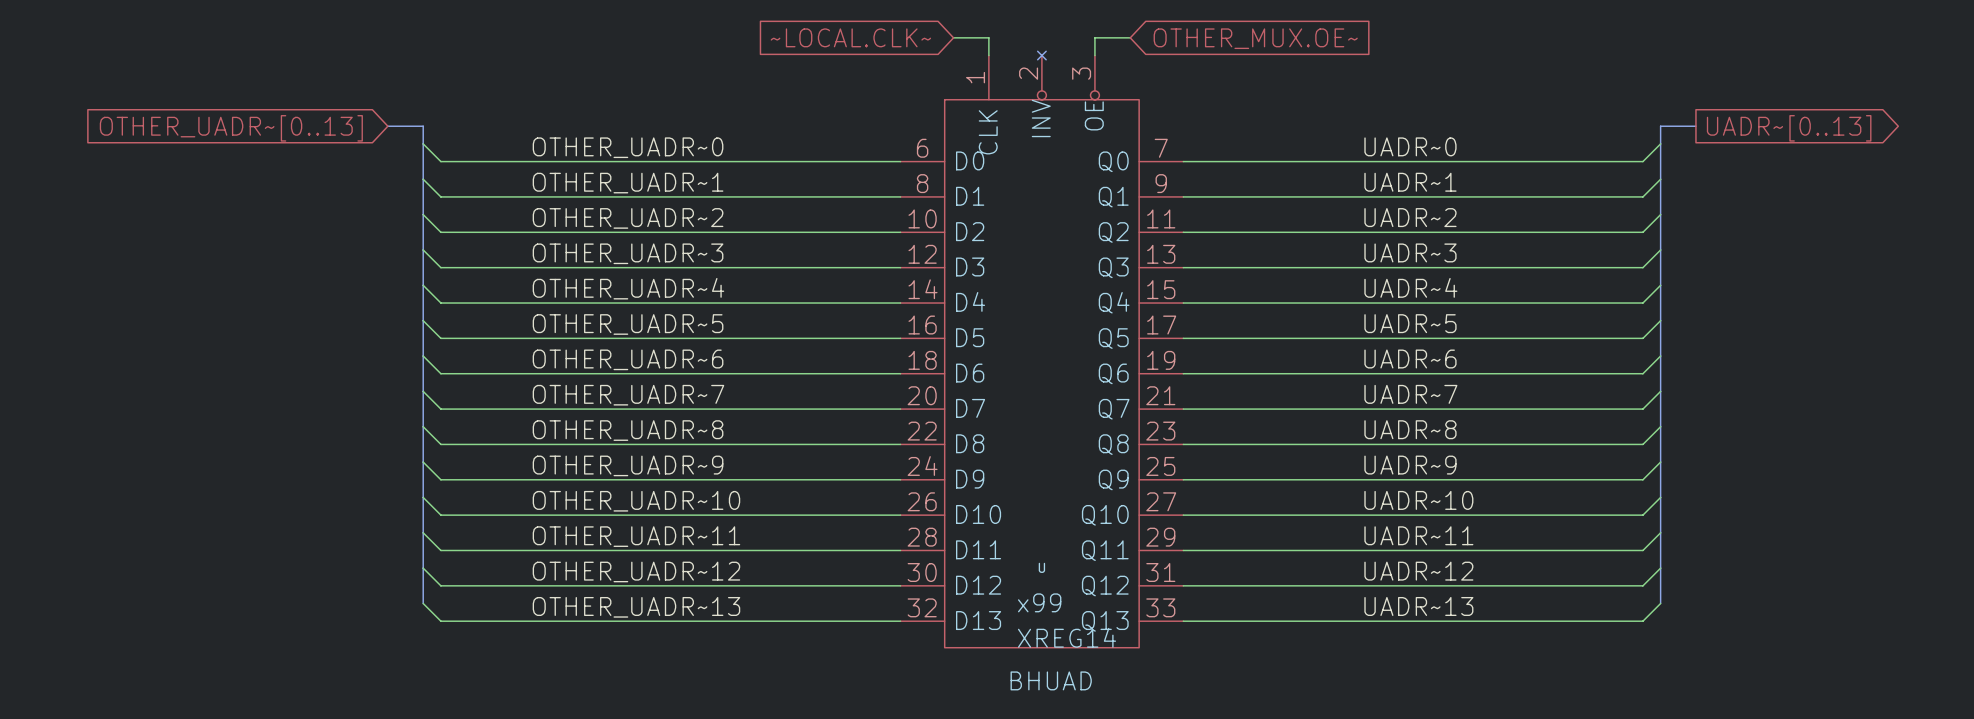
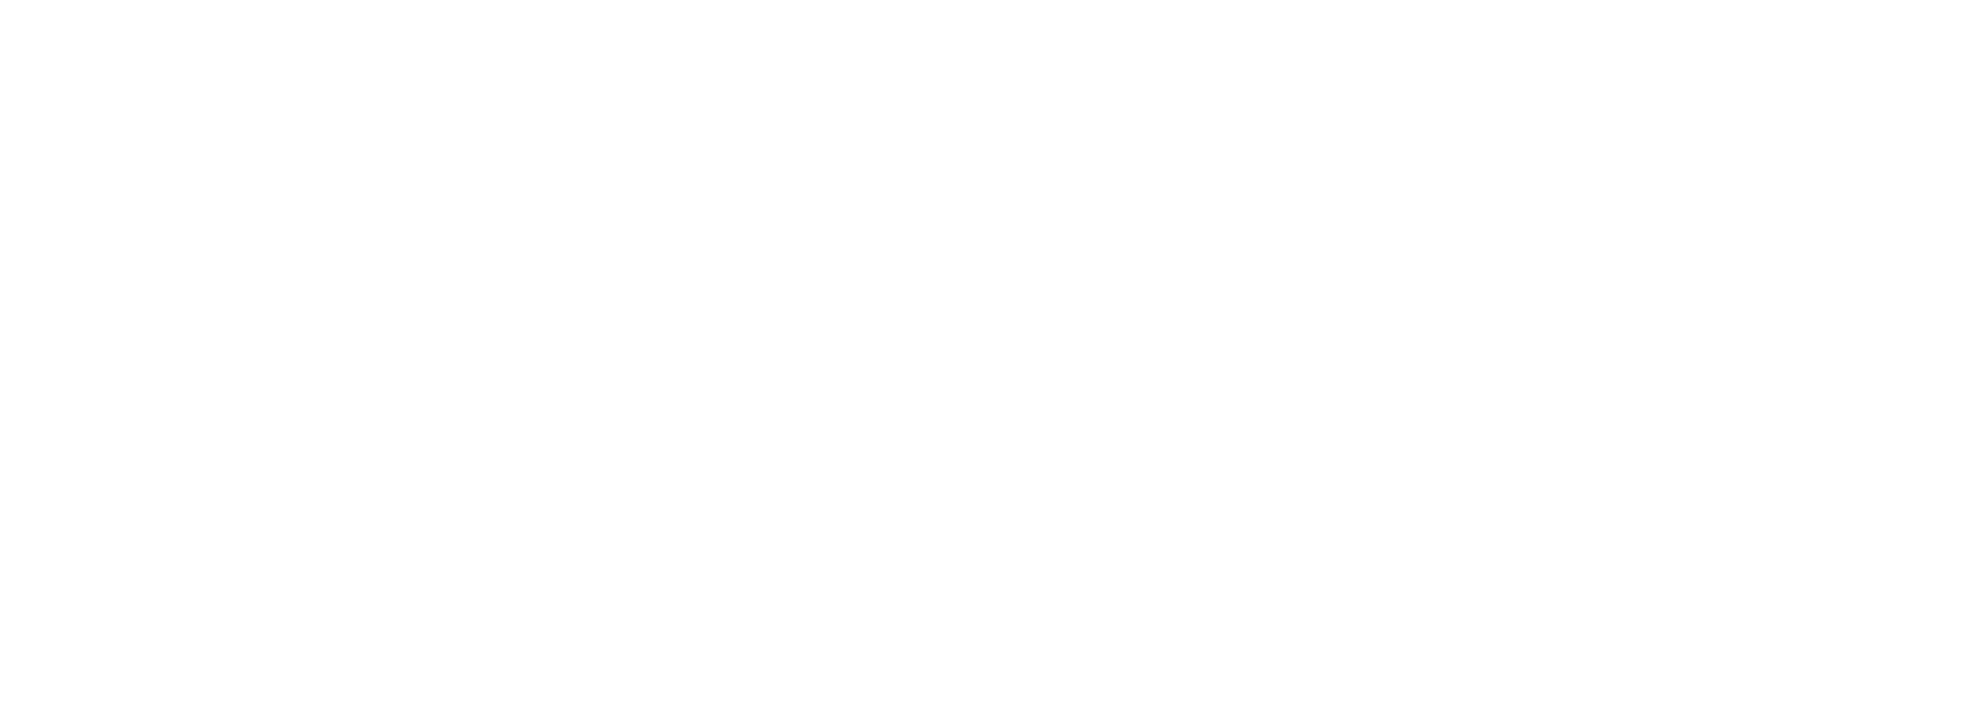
global label: ~LOCAL.CLK~ (850, 37) -> none
wire: (953, 37) (988, 37) (988, 55) -> none
wire: (1130, 37) (1094, 37) (1094, 55) -> none
global label: OTHER_MUX.OE~ (1255, 38) -> none
no-connect mark: (1041, 55) -> none
bus: (387, 126) (423, 126) (423, 603) -> none
bus: (1695, 126) (1660, 126) (1660, 603) -> none
global label: OTHER_UADR~[0..13] (231, 128) -> none
global label: UADR~[0..13] (1789, 128) -> none
wire: (423, 143) (440, 161) (900, 161) -> none
wire: (1660, 143) (1642, 161) (1183, 161) -> none
label: UADR~0 (1410, 146) -> none
label: OTHER_UADR~0 (628, 147) -> none
wire: (423, 179) (440, 196) (900, 196) -> none
wire: (1660, 179) (1642, 196) (1183, 196) -> none
label: UADR~1 (1410, 182) -> none
label: OTHER_UADR~1 (628, 183) -> none
wire: (423, 214) (440, 232) (900, 232) -> none
wire: (1660, 214) (1642, 232) (1183, 232) -> none
label: UADR~2 (1410, 217) -> none
label: OTHER_UADR~2 (628, 218) -> none
wire: (423, 249) (440, 267) (900, 267) -> none
wire: (1660, 249) (1642, 267) (1183, 267) -> none
label: UADR~3 (1410, 252) -> none
label: OTHER_UADR~3 (628, 253) -> none
wire: (423, 285) (440, 303) (900, 303) -> none
wire: (1660, 285) (1642, 303) (1183, 303) -> none
label: UADR~4 (1410, 287) -> none
label: OTHER_UADR~4 (628, 288) -> none
wire: (423, 320) (440, 338) (900, 338) -> none
wire: (1660, 320) (1642, 338) (1183, 338) -> none
label: UADR~5 (1410, 323) -> none
label: OTHER_UADR~5 (628, 324) -> none
U: XREG14 (1041, 351) -> none
wire: (423, 356) (440, 373) (900, 373) -> none
wire: (1660, 356) (1642, 373) (1183, 373) -> none
label: OTHER_UADR~6 (628, 359) -> none
label: UADR~6 (1410, 359) -> none
wire: (423, 391) (440, 409) (900, 409) -> none
wire: (1660, 391) (1642, 409) (1183, 409) -> none
label: UADR~7 (1410, 394) -> none
label: OTHER_UADR~7 (628, 395) -> none
wire: (423, 426) (440, 444) (900, 444) -> none
wire: (1660, 426) (1642, 444) (1183, 444) -> none
label: UADR~8 (1410, 429) -> none
label: OTHER_UADR~8 (628, 430) -> none
wire: (423, 462) (440, 479) (900, 479) -> none
wire: (1660, 462) (1642, 479) (1183, 479) -> none
label: OTHER_UADR~9 (628, 465) -> none
label: UADR~9 (1410, 465) -> none
wire: (423, 497) (440, 515) (900, 515) -> none
wire: (1660, 497) (1642, 515) (1183, 515) -> none
label: UADR~10 (1418, 500) -> none
label: OTHER_UADR~10 (636, 501) -> none
wire: (423, 532) (440, 550) (900, 550) -> none
wire: (1660, 532) (1642, 550) (1183, 550) -> none
label: UADR~11 (1418, 535) -> none
label: OTHER_UADR~11 (636, 536) -> none
wire: (423, 568) (440, 585) (900, 585) -> none
wire: (1660, 568) (1642, 585) (1183, 585) -> none
label: OTHER_UADR~12 (636, 571) -> none
label: UADR~12 (1418, 571) -> none
wire: (423, 603) (440, 621) (900, 621) -> none
wire: (1660, 603) (1642, 621) (1183, 621) -> none
label: UADR~13 (1418, 606) -> none
label: OTHER_UADR~13 (636, 607) -> none

